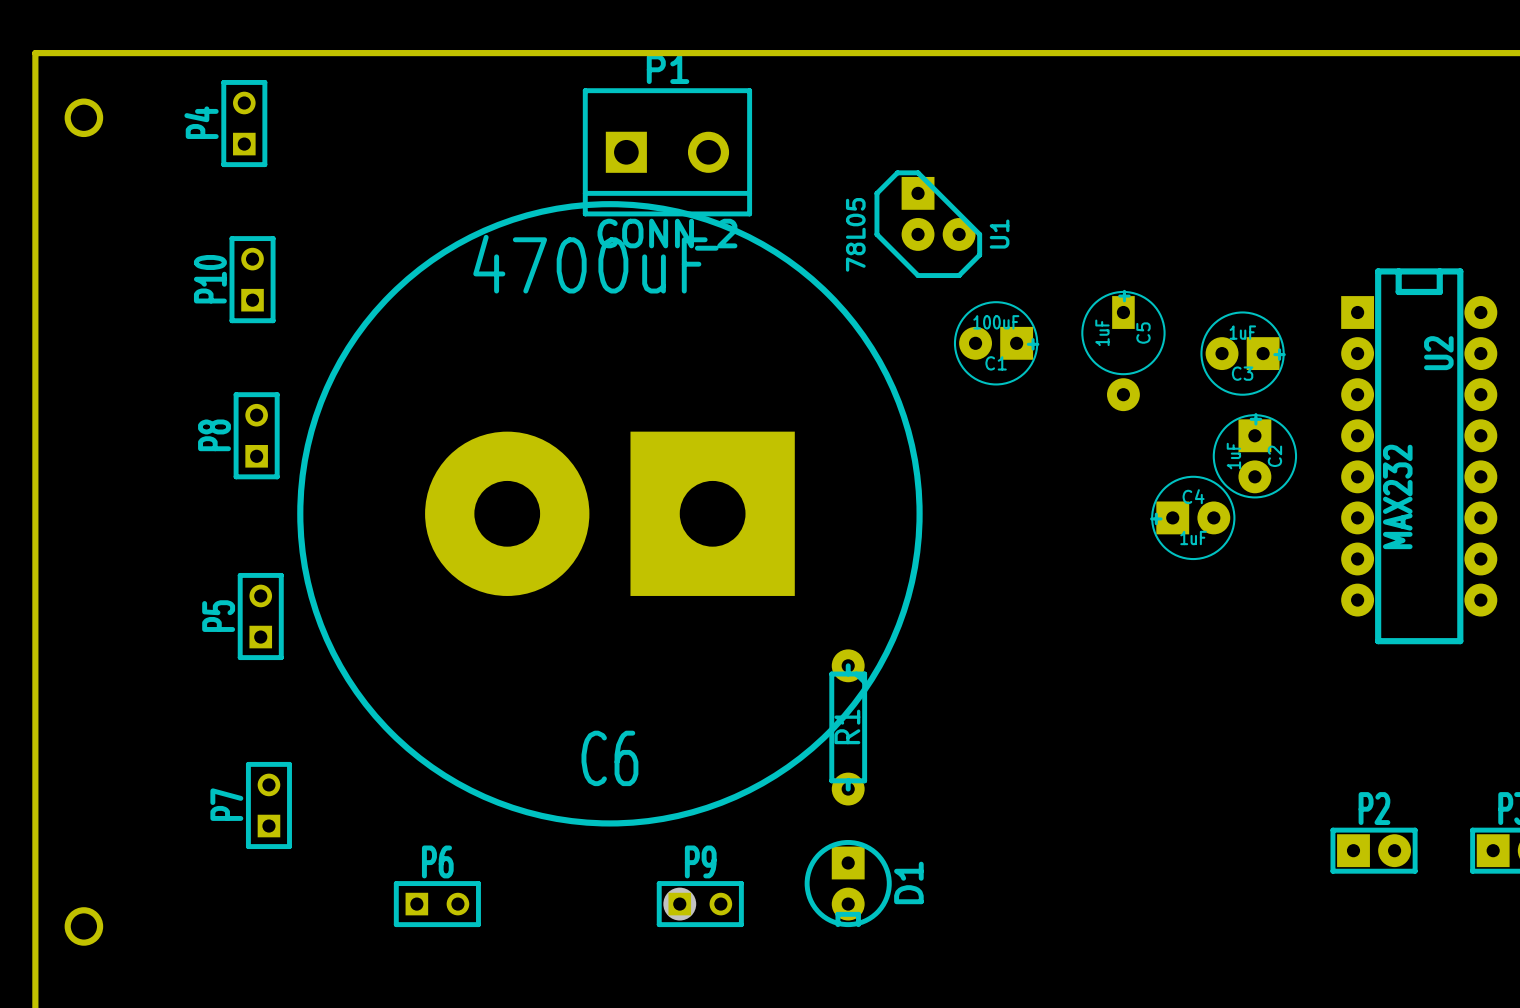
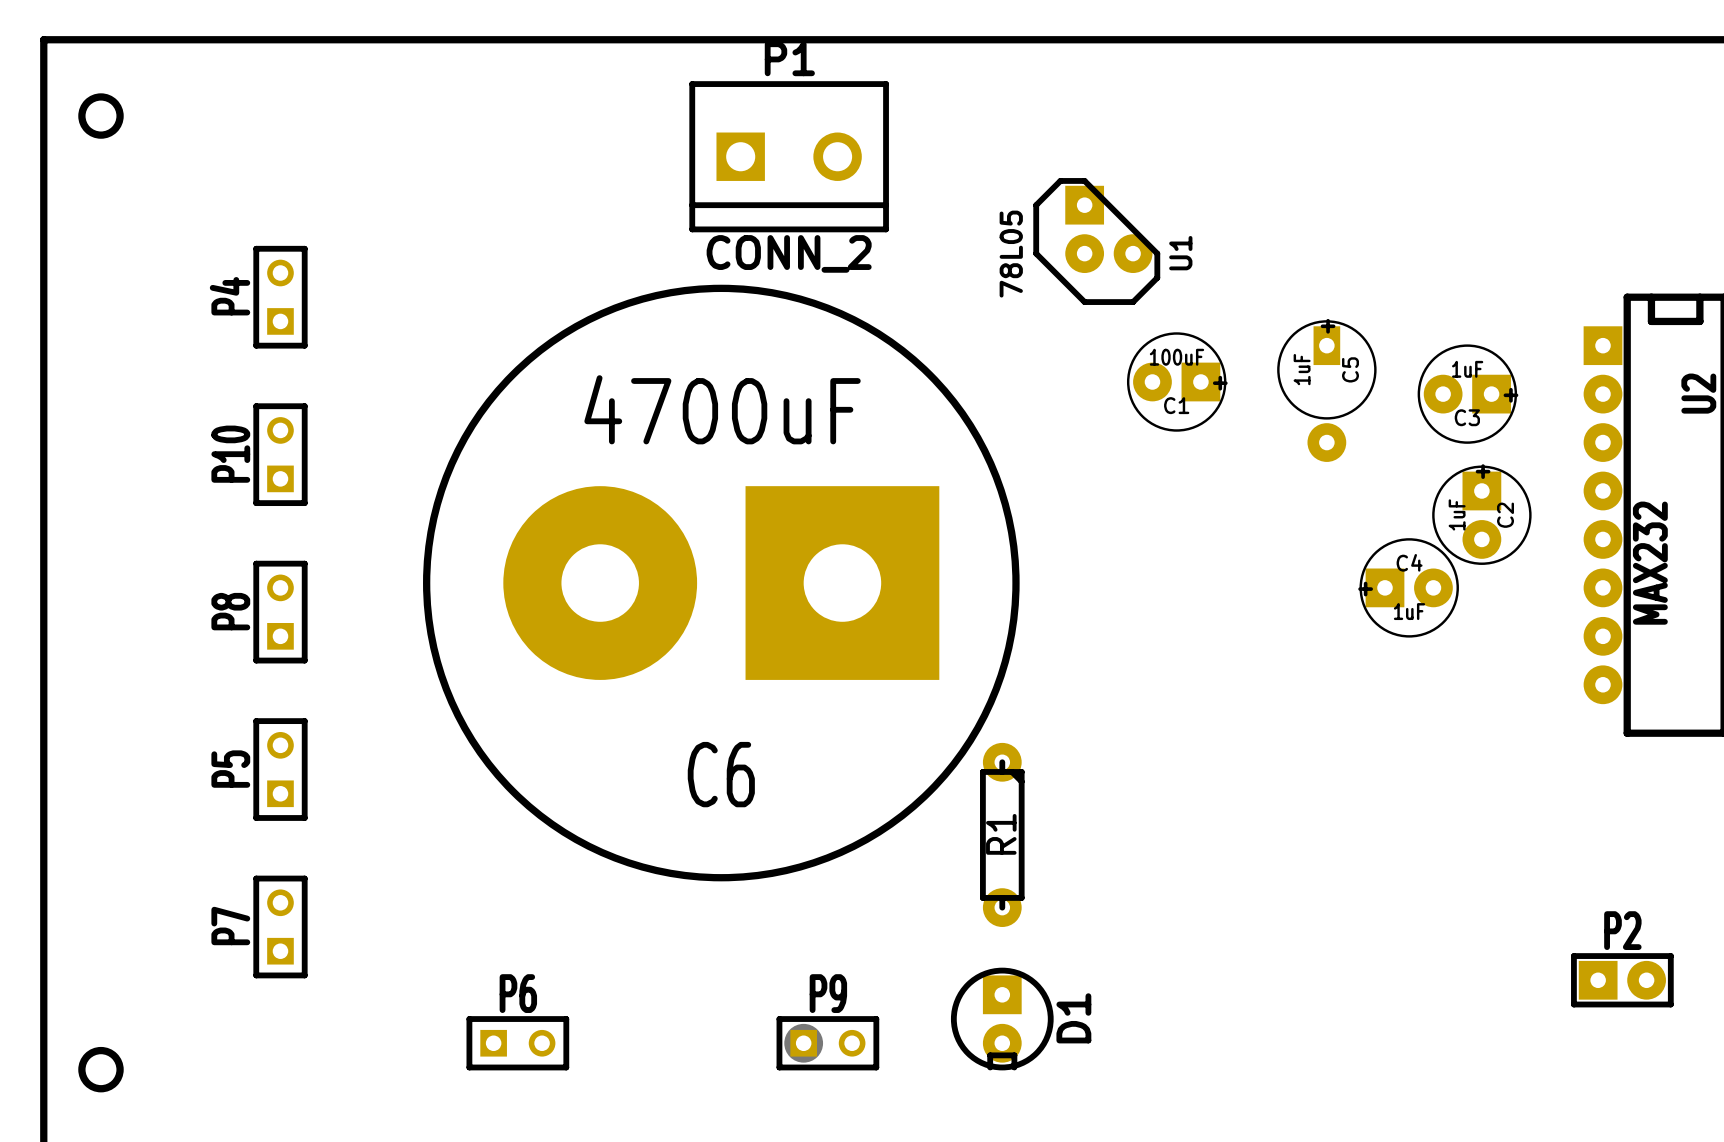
P4 position: (244, 123) -> (280, 297)
C6 footprint: [297, 201, 923, 827] -> [423, 284, 1020, 882]
C6 value position: 4700uF (590, 264) -> 4700uF (722, 409)
P10 position: (252, 279) -> (280, 454)
P8 position: (256, 435) -> (280, 612)
P5 position: (260, 616) -> (280, 769)
C6 name position: C6 (609, 758) -> C6 (721, 774)
P7 position: (268, 805) -> (280, 926)

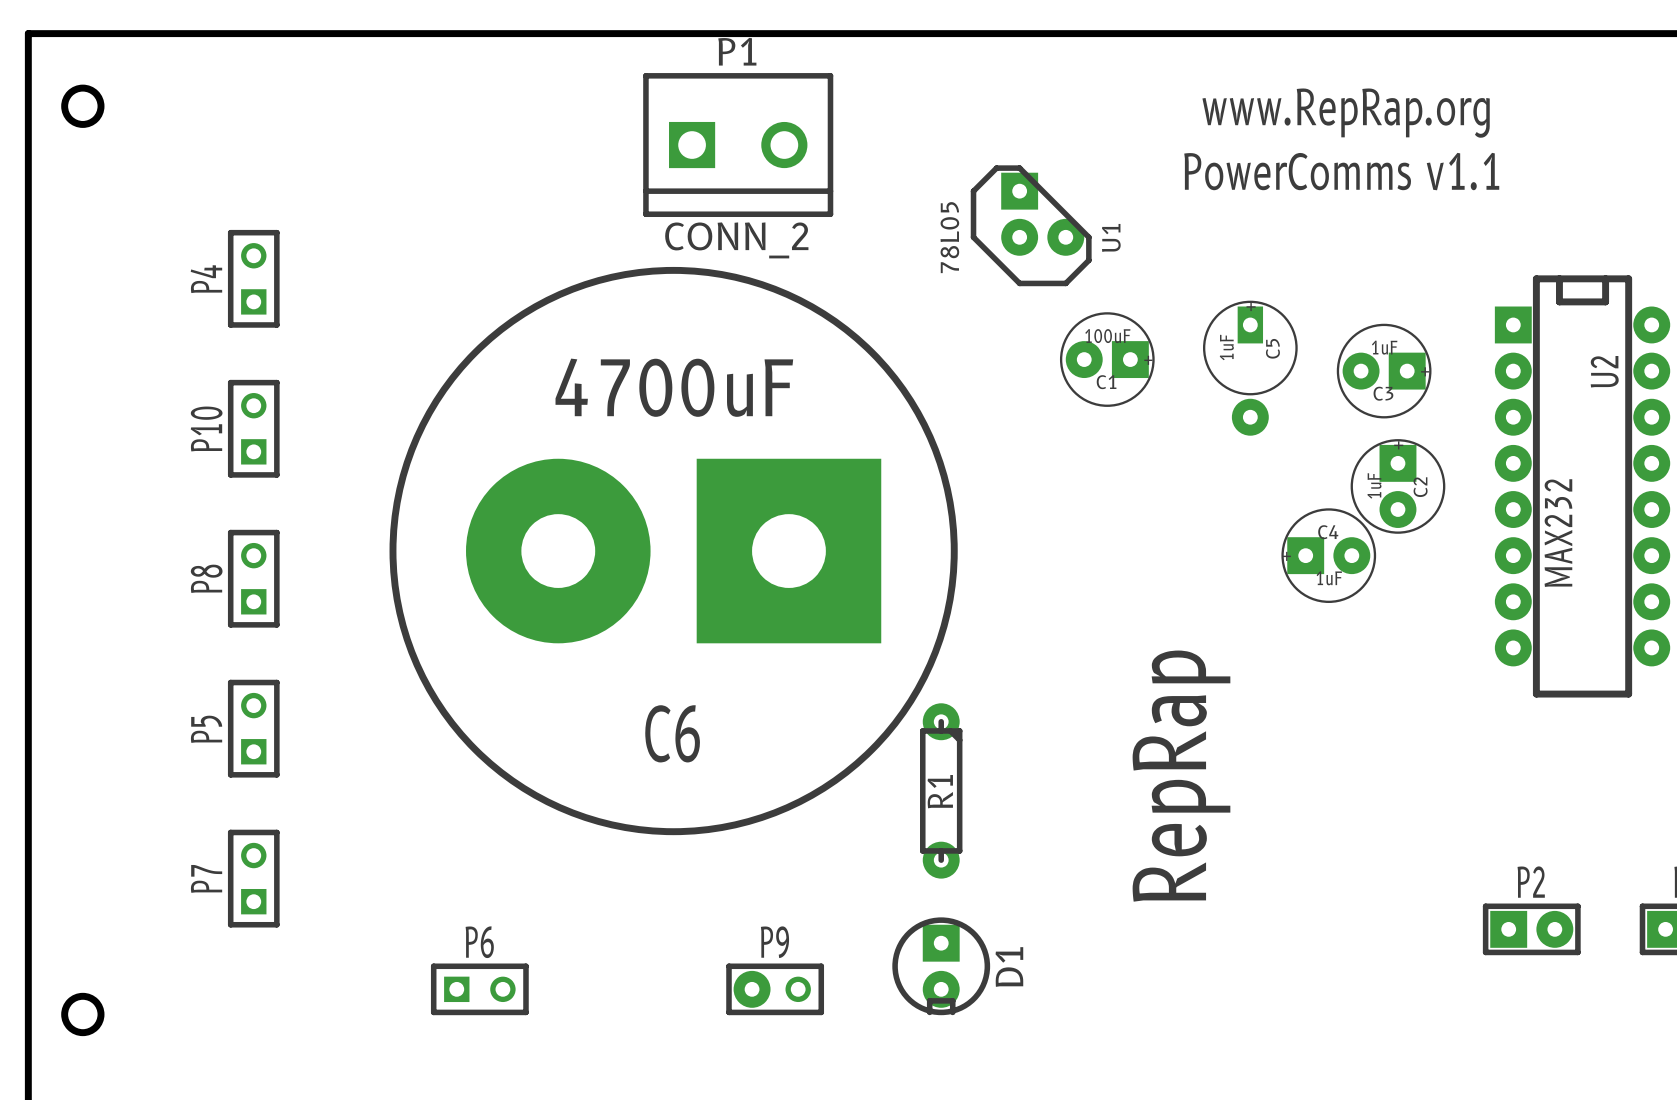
text: none -> www.RepRap.org (1346, 113)
text: none -> PowerComms v1.1 (1341, 171)
text: none -> RepRap (1181, 776)

